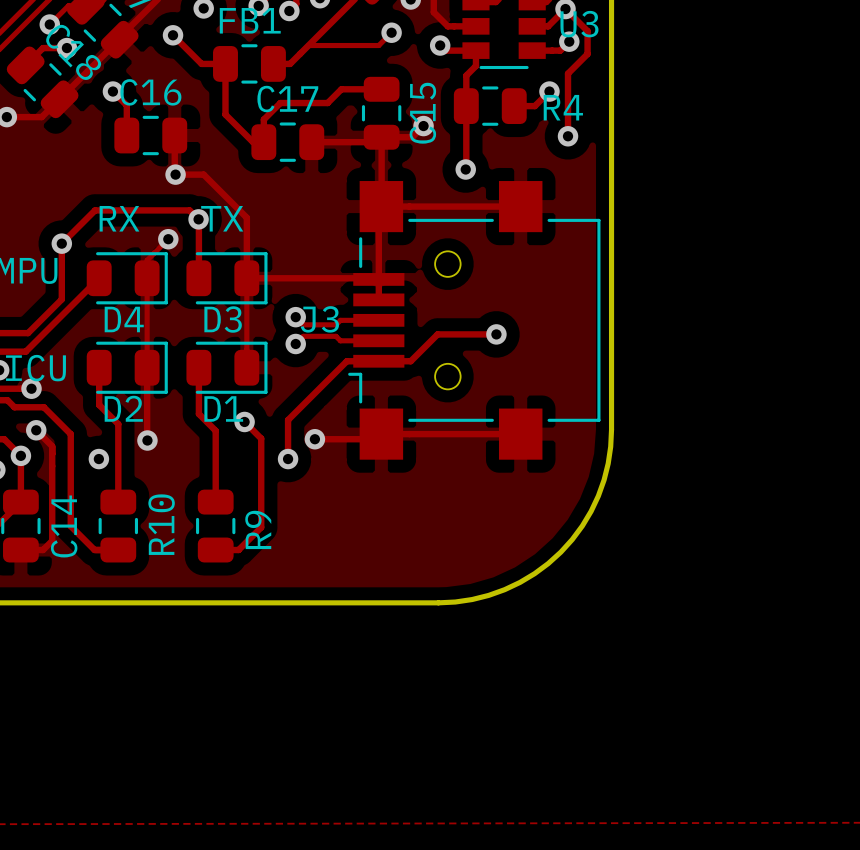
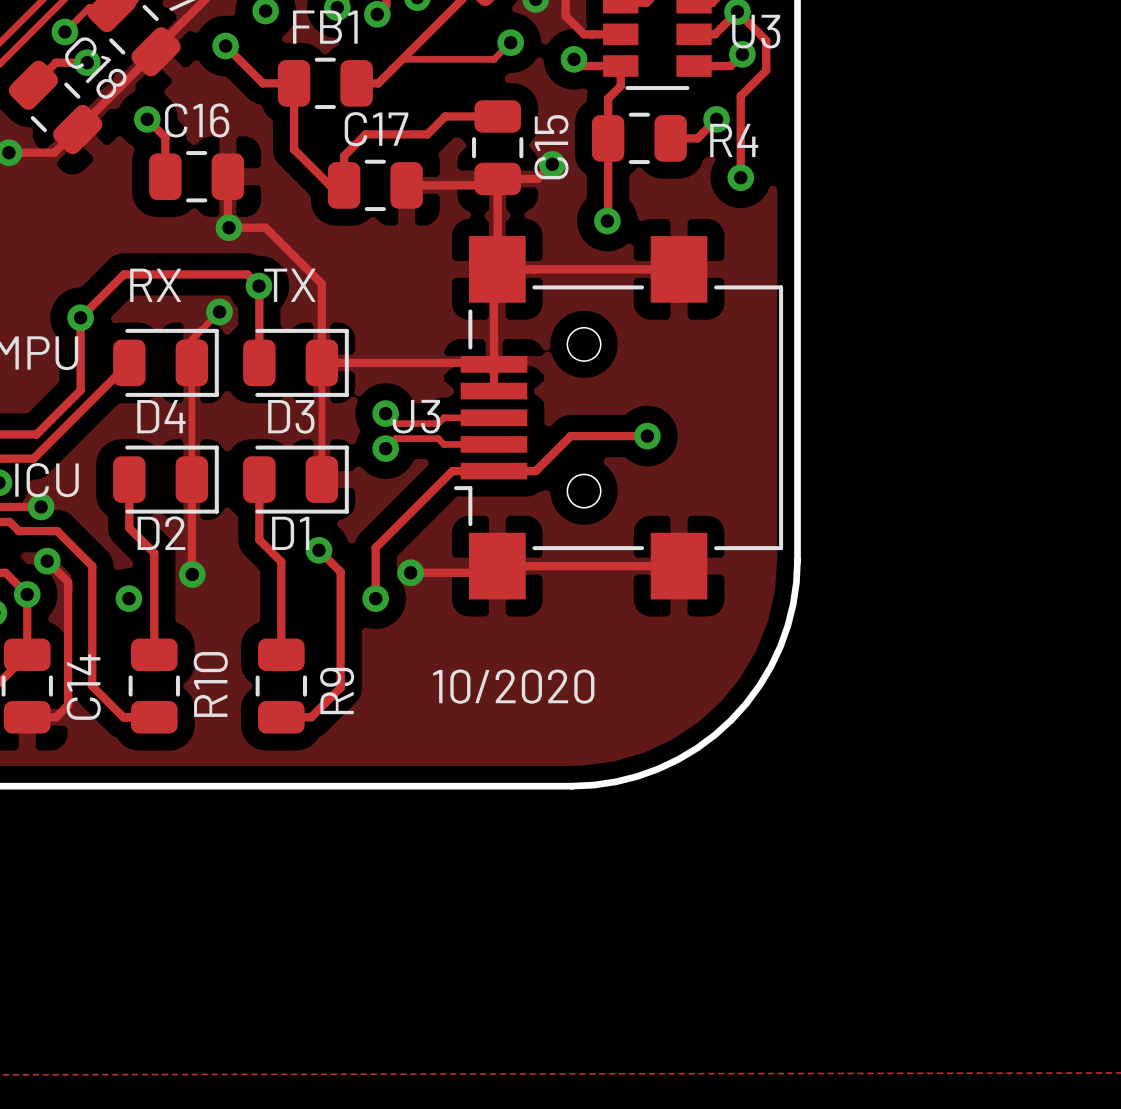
text: none -> 10/2020 (513, 686)

